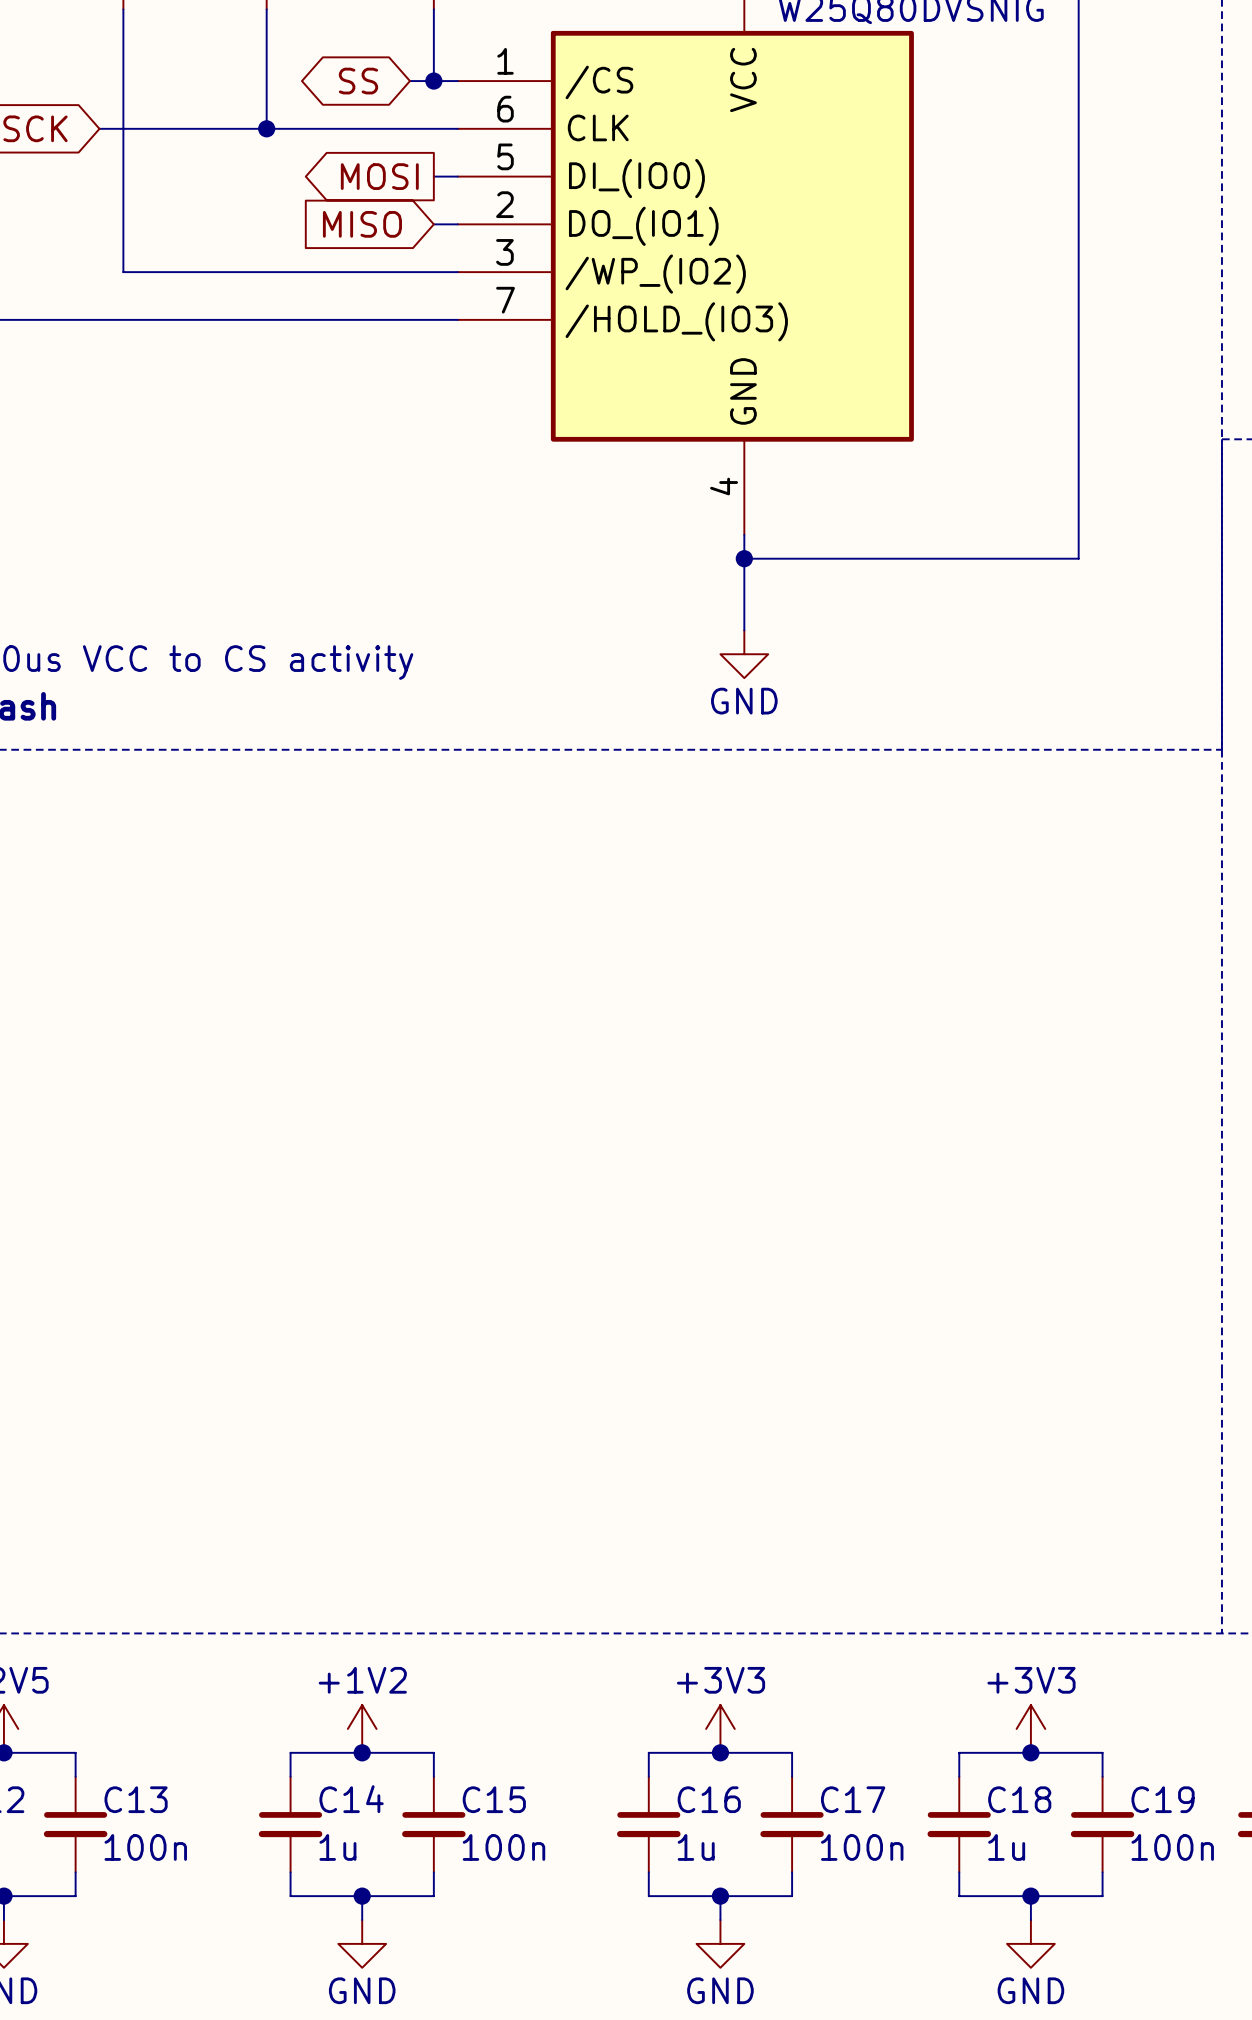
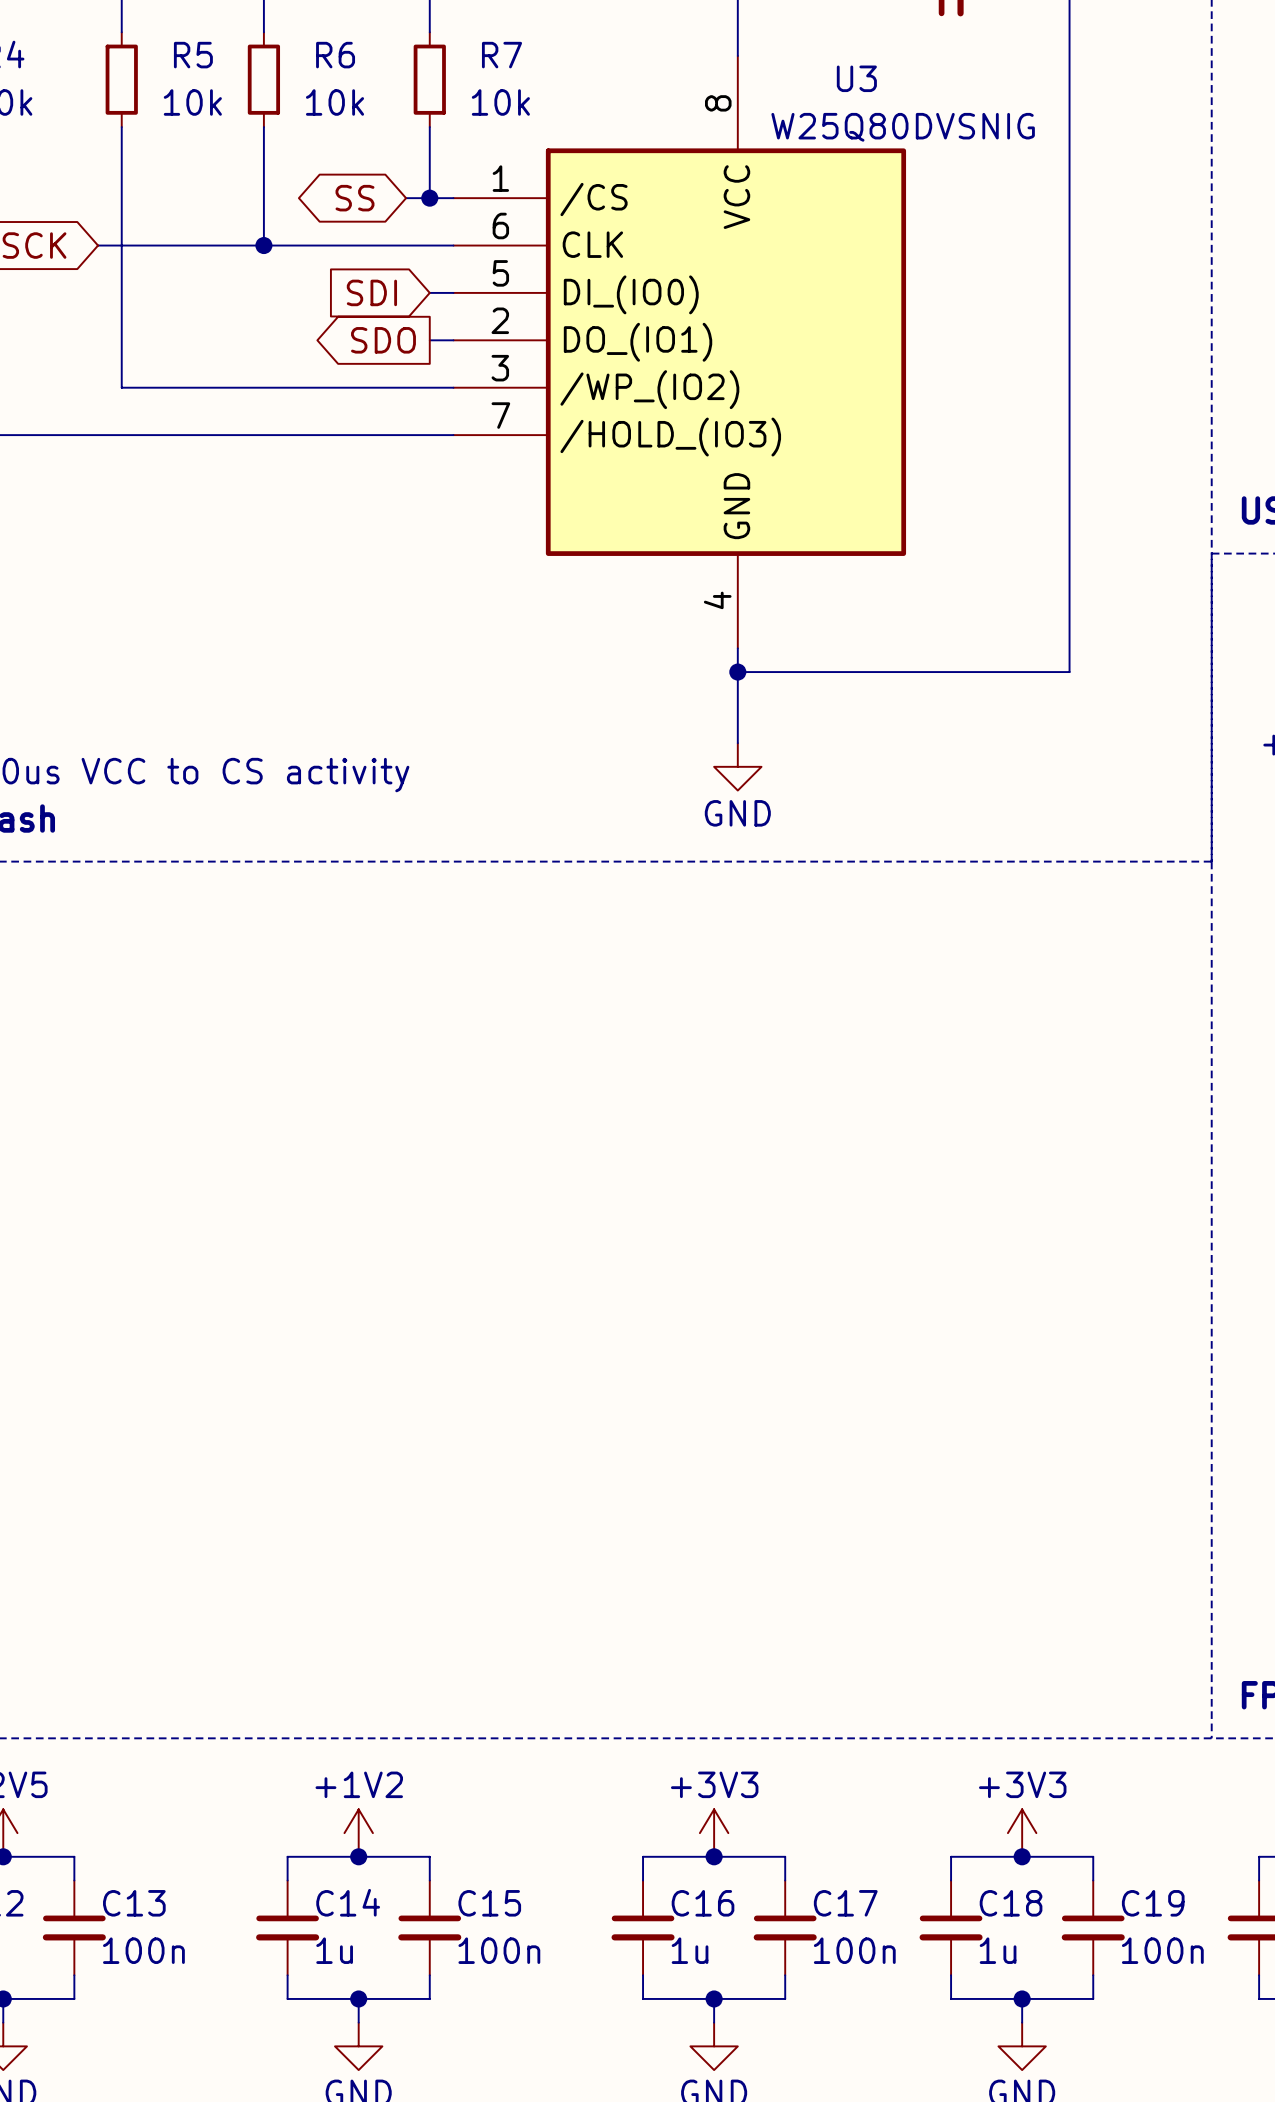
global label shape: output (379, 176) -> input (371, 292)
global label: MOSI (379, 176) -> SDI (371, 292)
global label shape: input (362, 224) -> output (383, 340)
global label: MISO (362, 224) -> SDO (383, 340)

